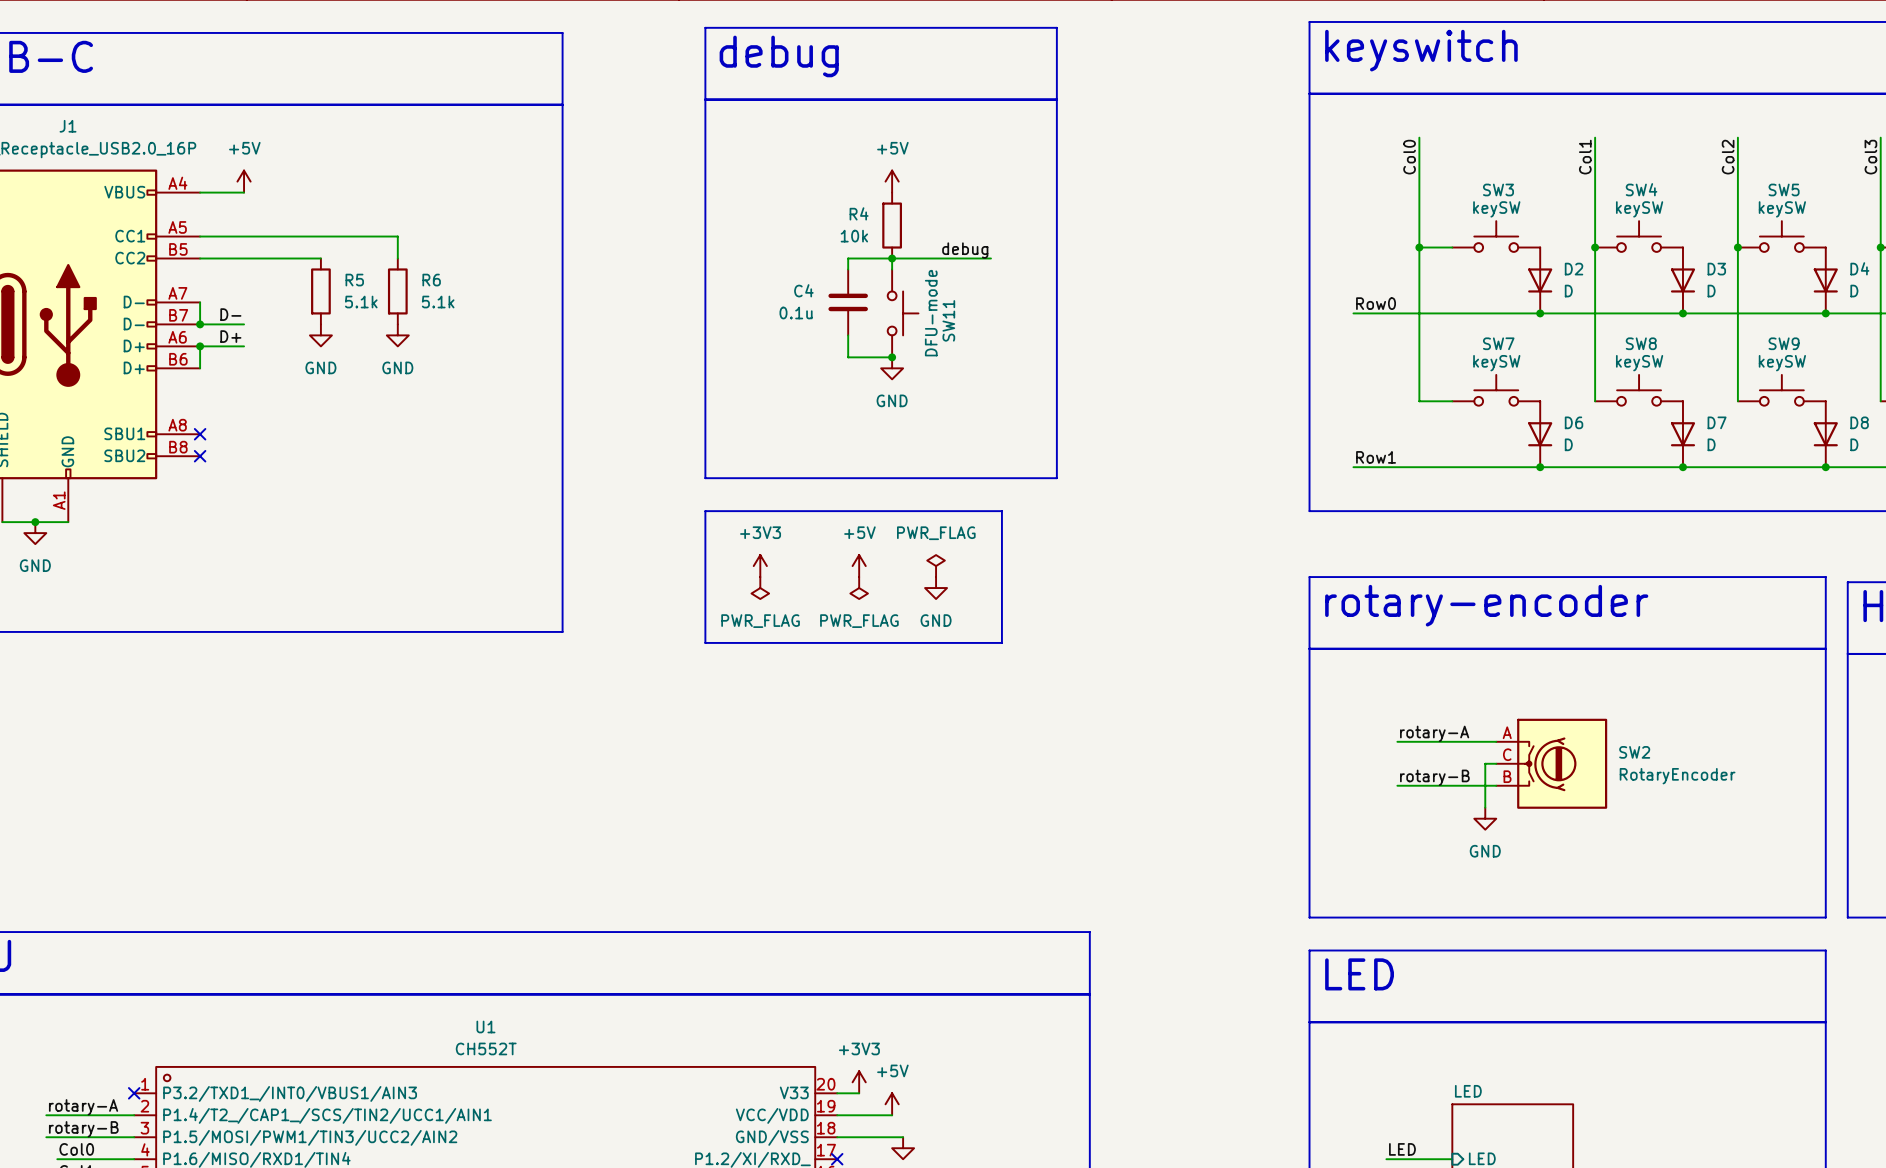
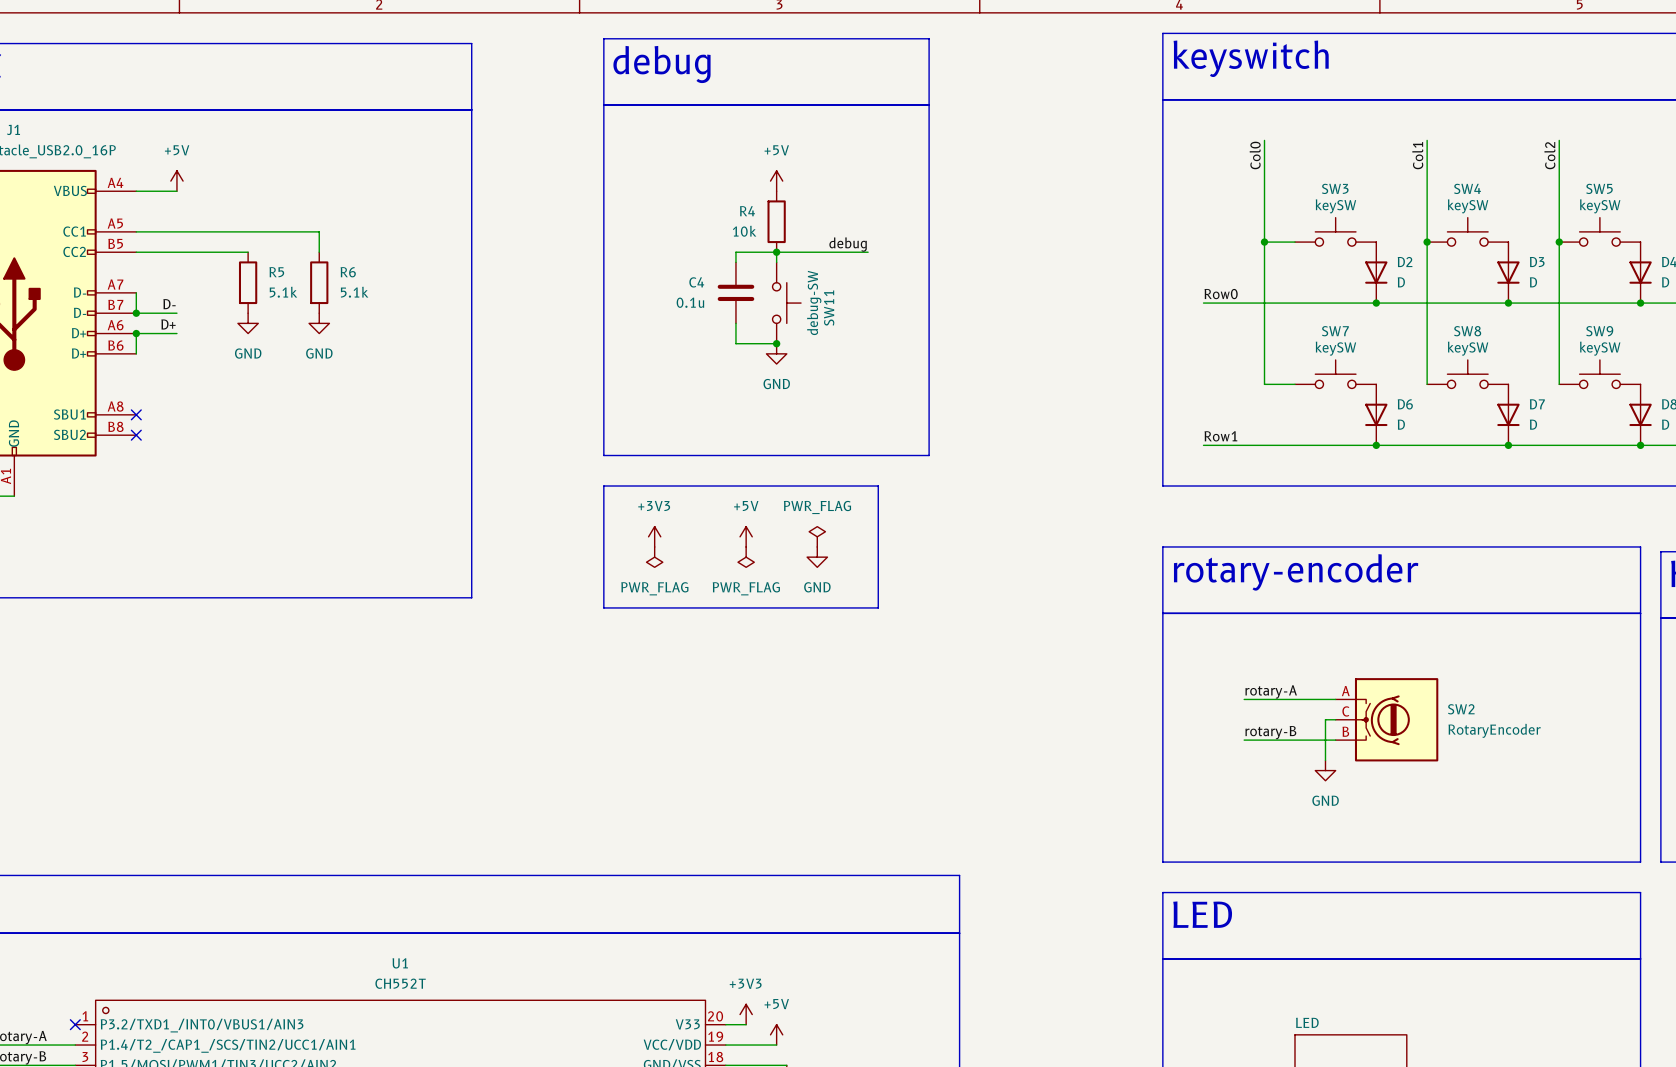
SW11 value: DFU-mode (931, 313) -> debug-SW (814, 302)

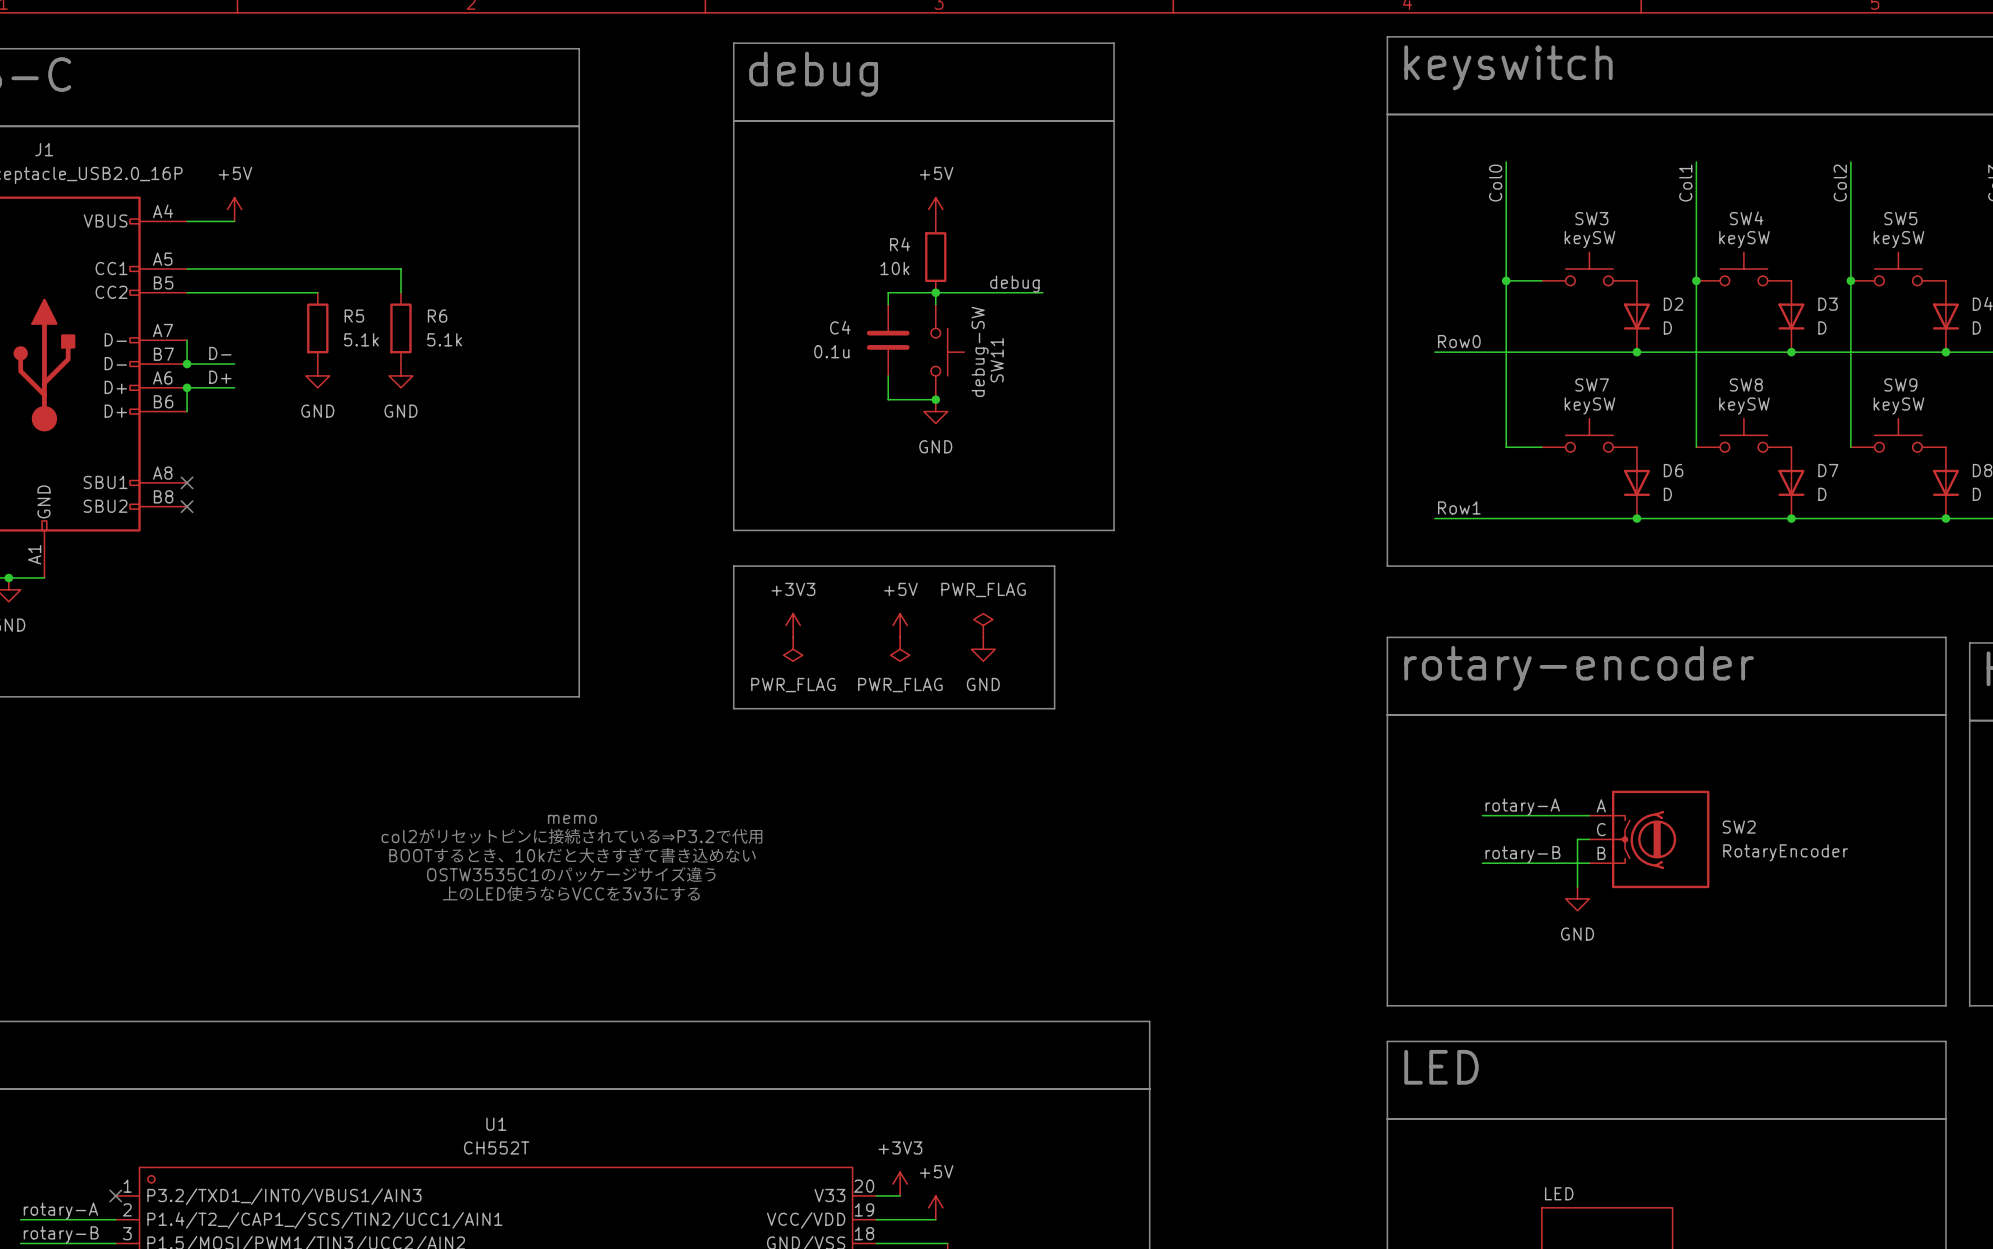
text: none -> memo (572, 819)
text: none -> col2がリセットピンに接続されている⇒P3.2で代用 (572, 836)
text: none -> BOOTするとき、10kだと大きすぎて書き込めない (572, 855)
text: none -> OSTW3535C1のパッケージサイズ違う (571, 874)
text: none -> 上のLED使うならVCCを3v3にする (571, 893)

